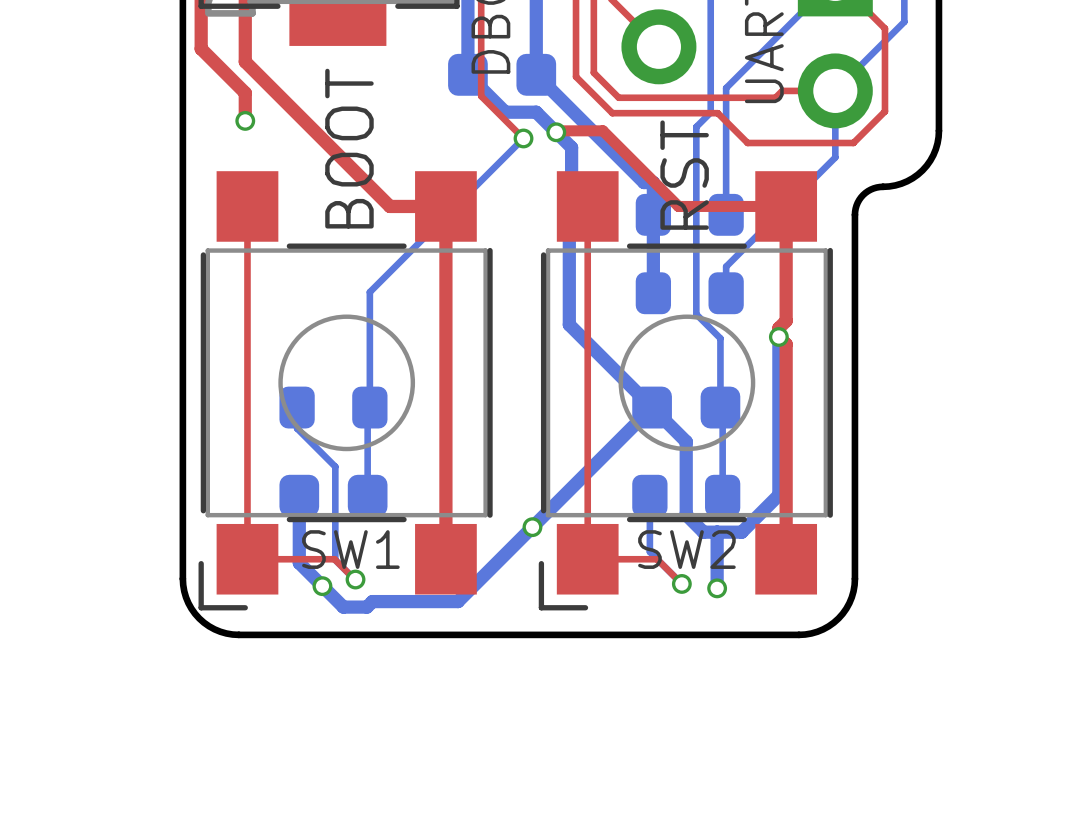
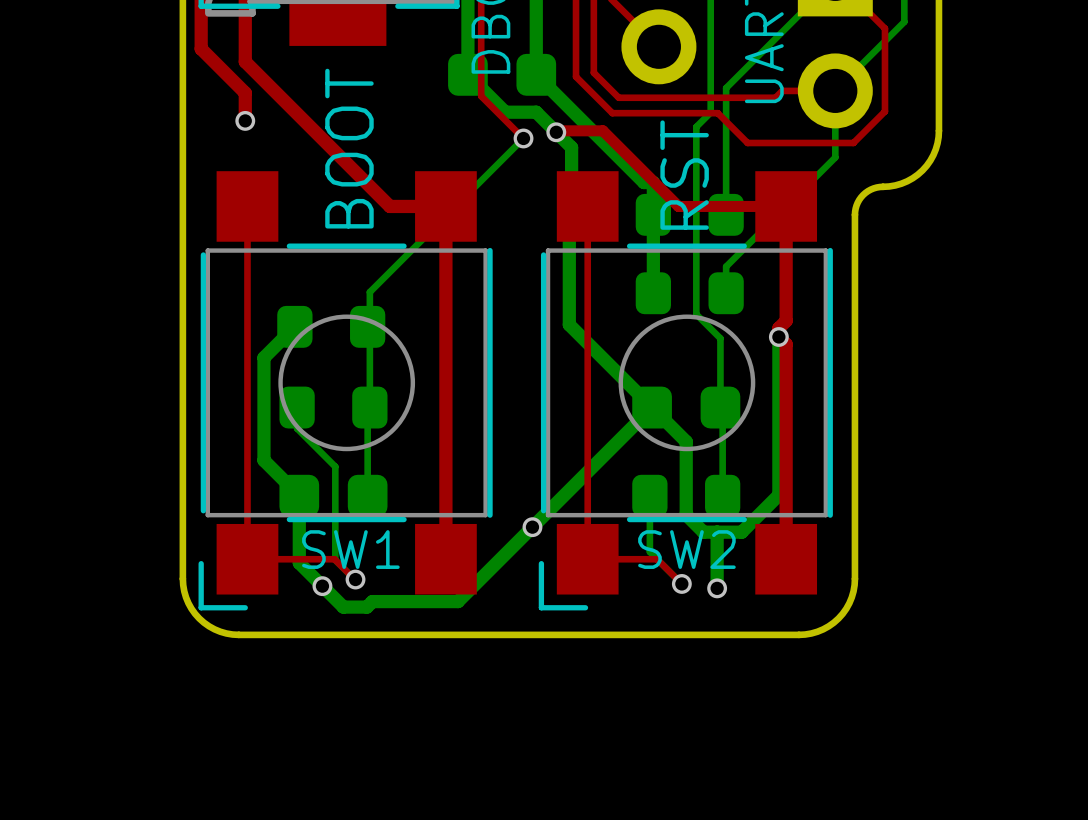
bottom track: none -> (294, 326) (263, 357) (263, 460) (299, 495)
part: none -> (331, 326)

